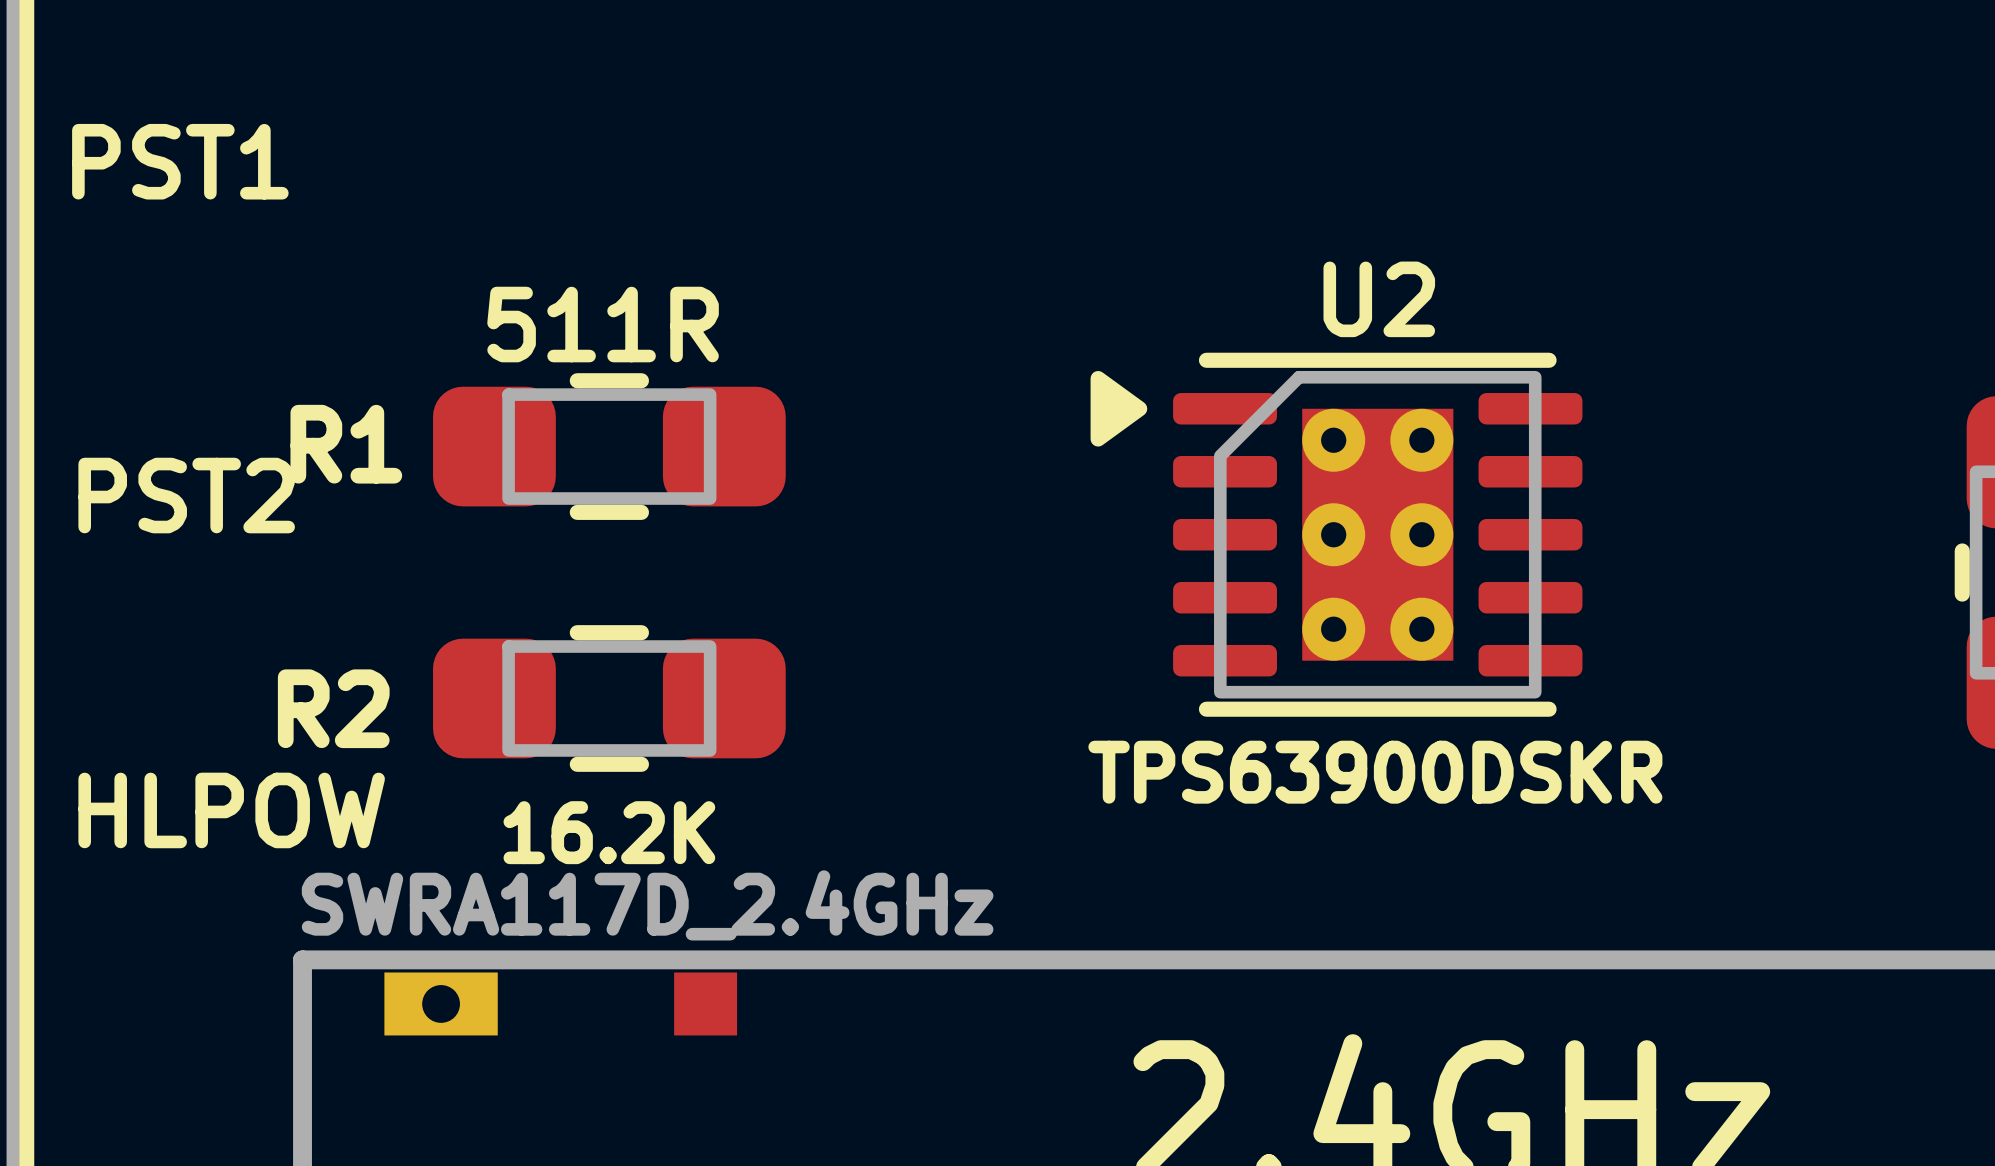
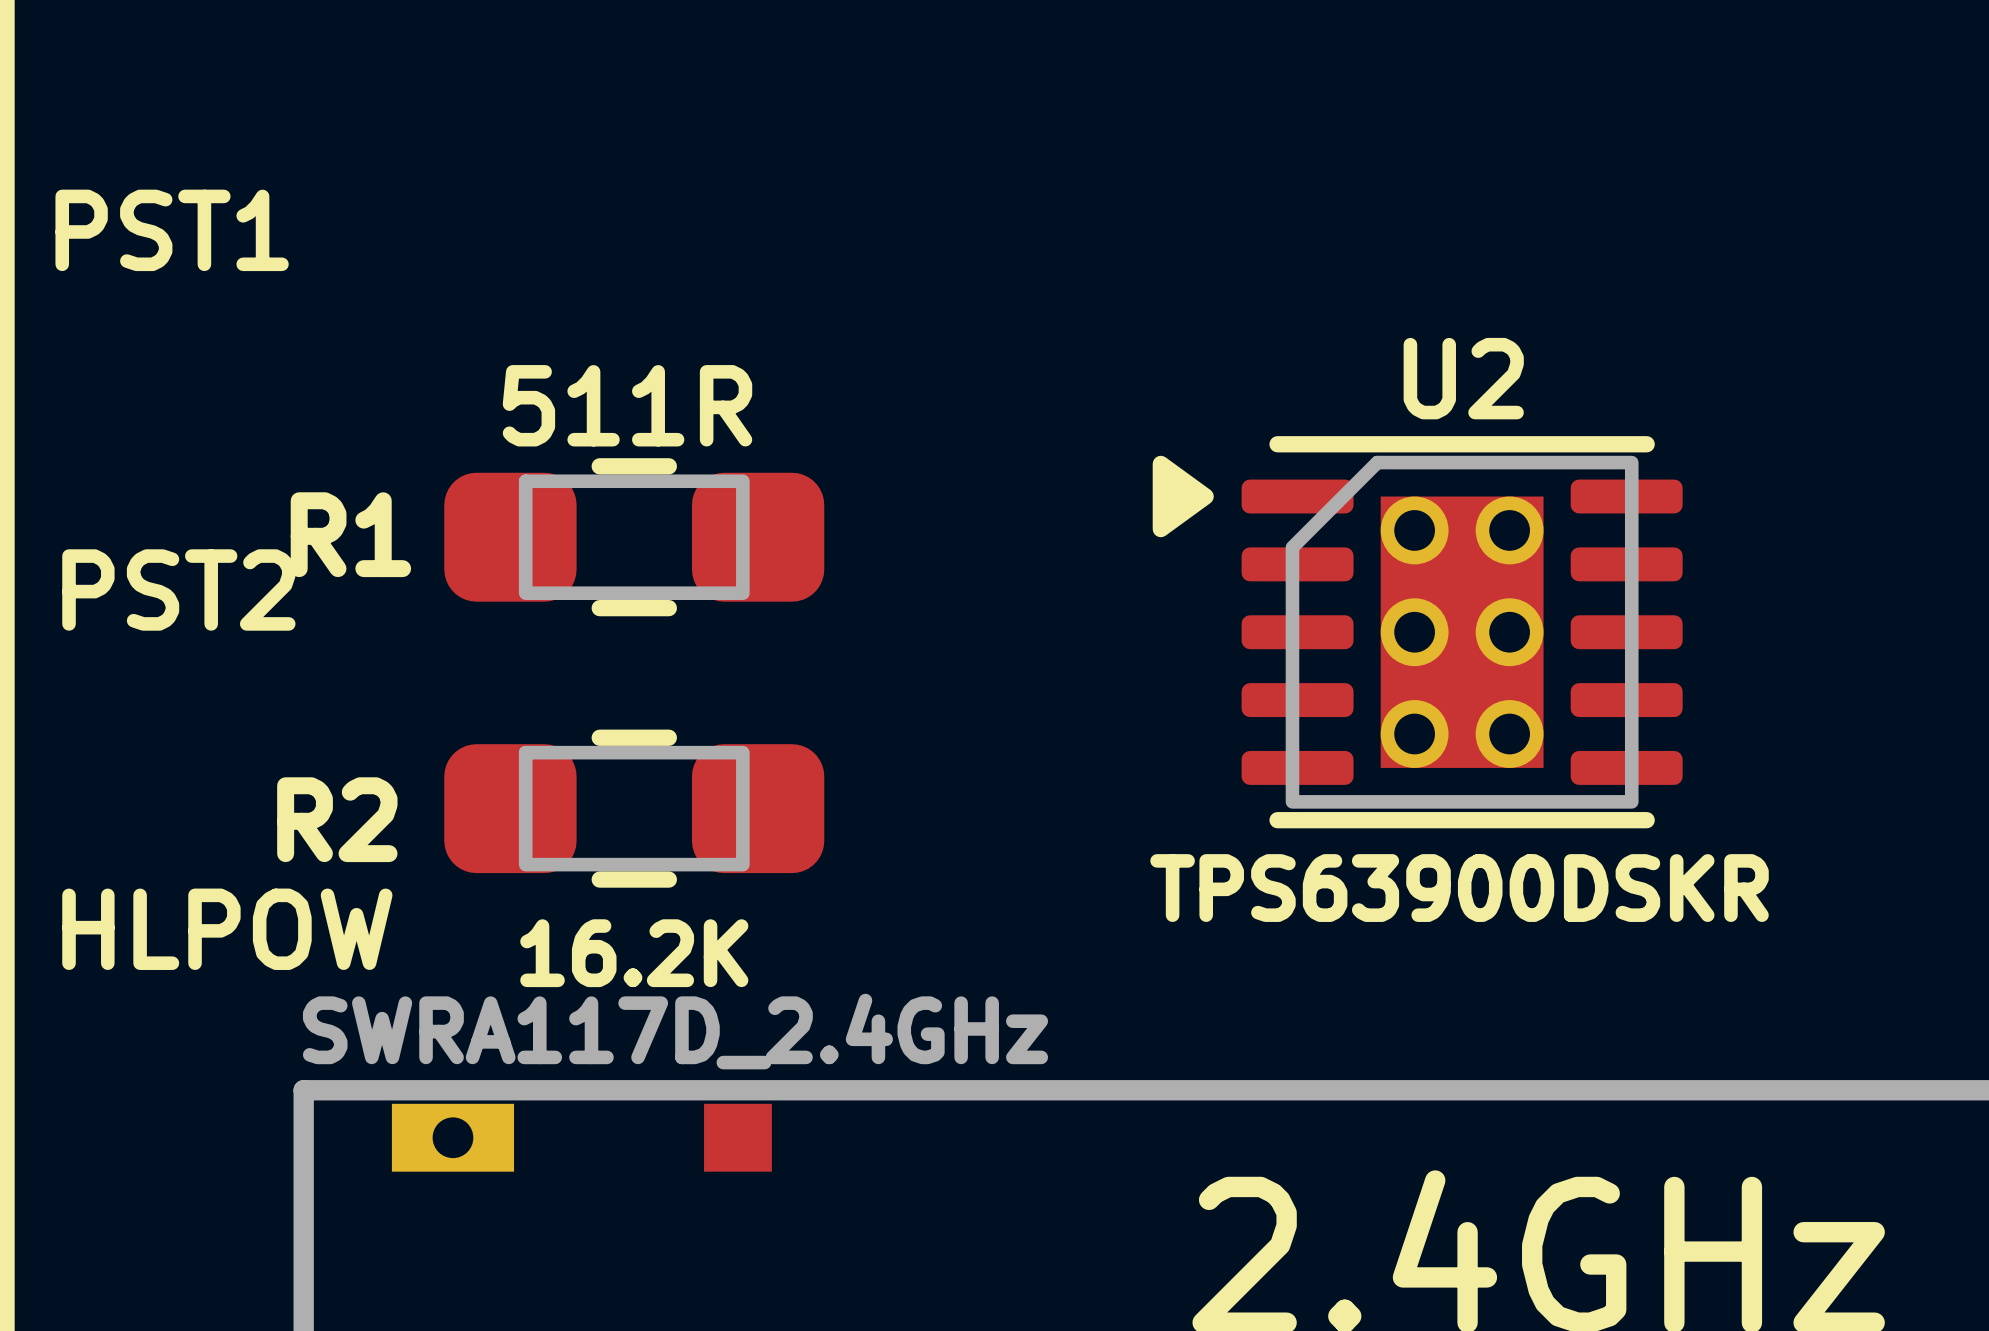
U2 footprint: [1090, 352, 1583, 717] -> [1152, 436, 1683, 829]

